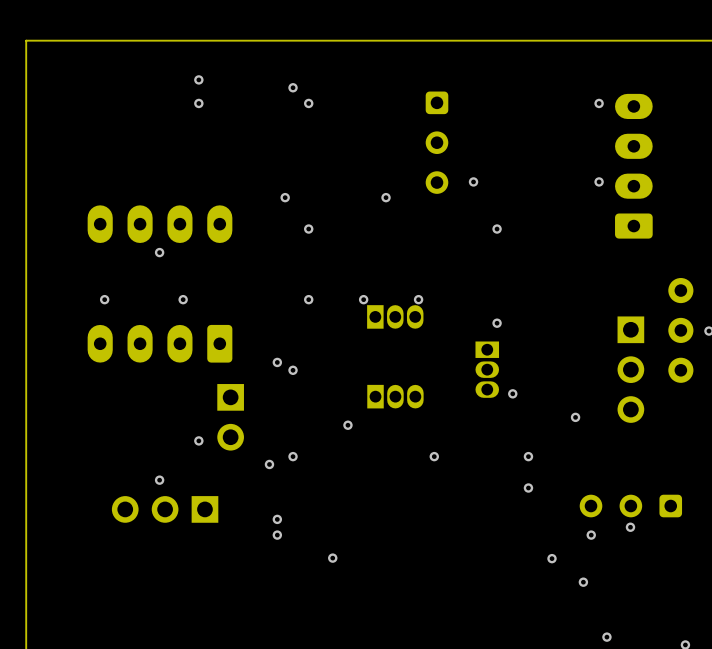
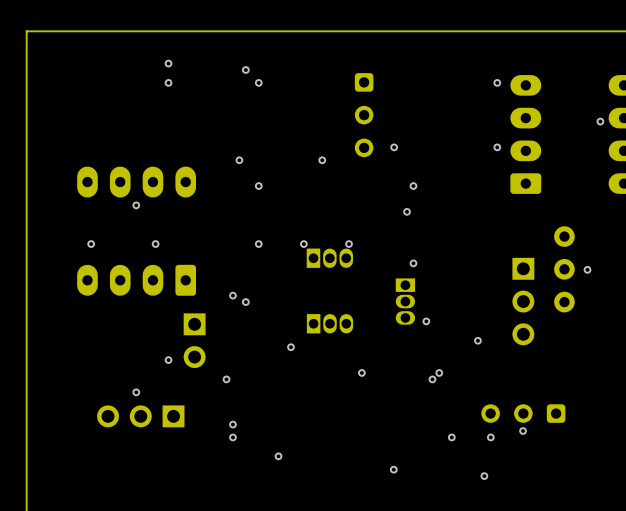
via: none -> (407, 211)
via: (293, 456) -> none
via: none -> (432, 379)
via: (528, 488) -> none
via: none -> (451, 437)
via: (552, 558) -> none
via: none -> (393, 469)

